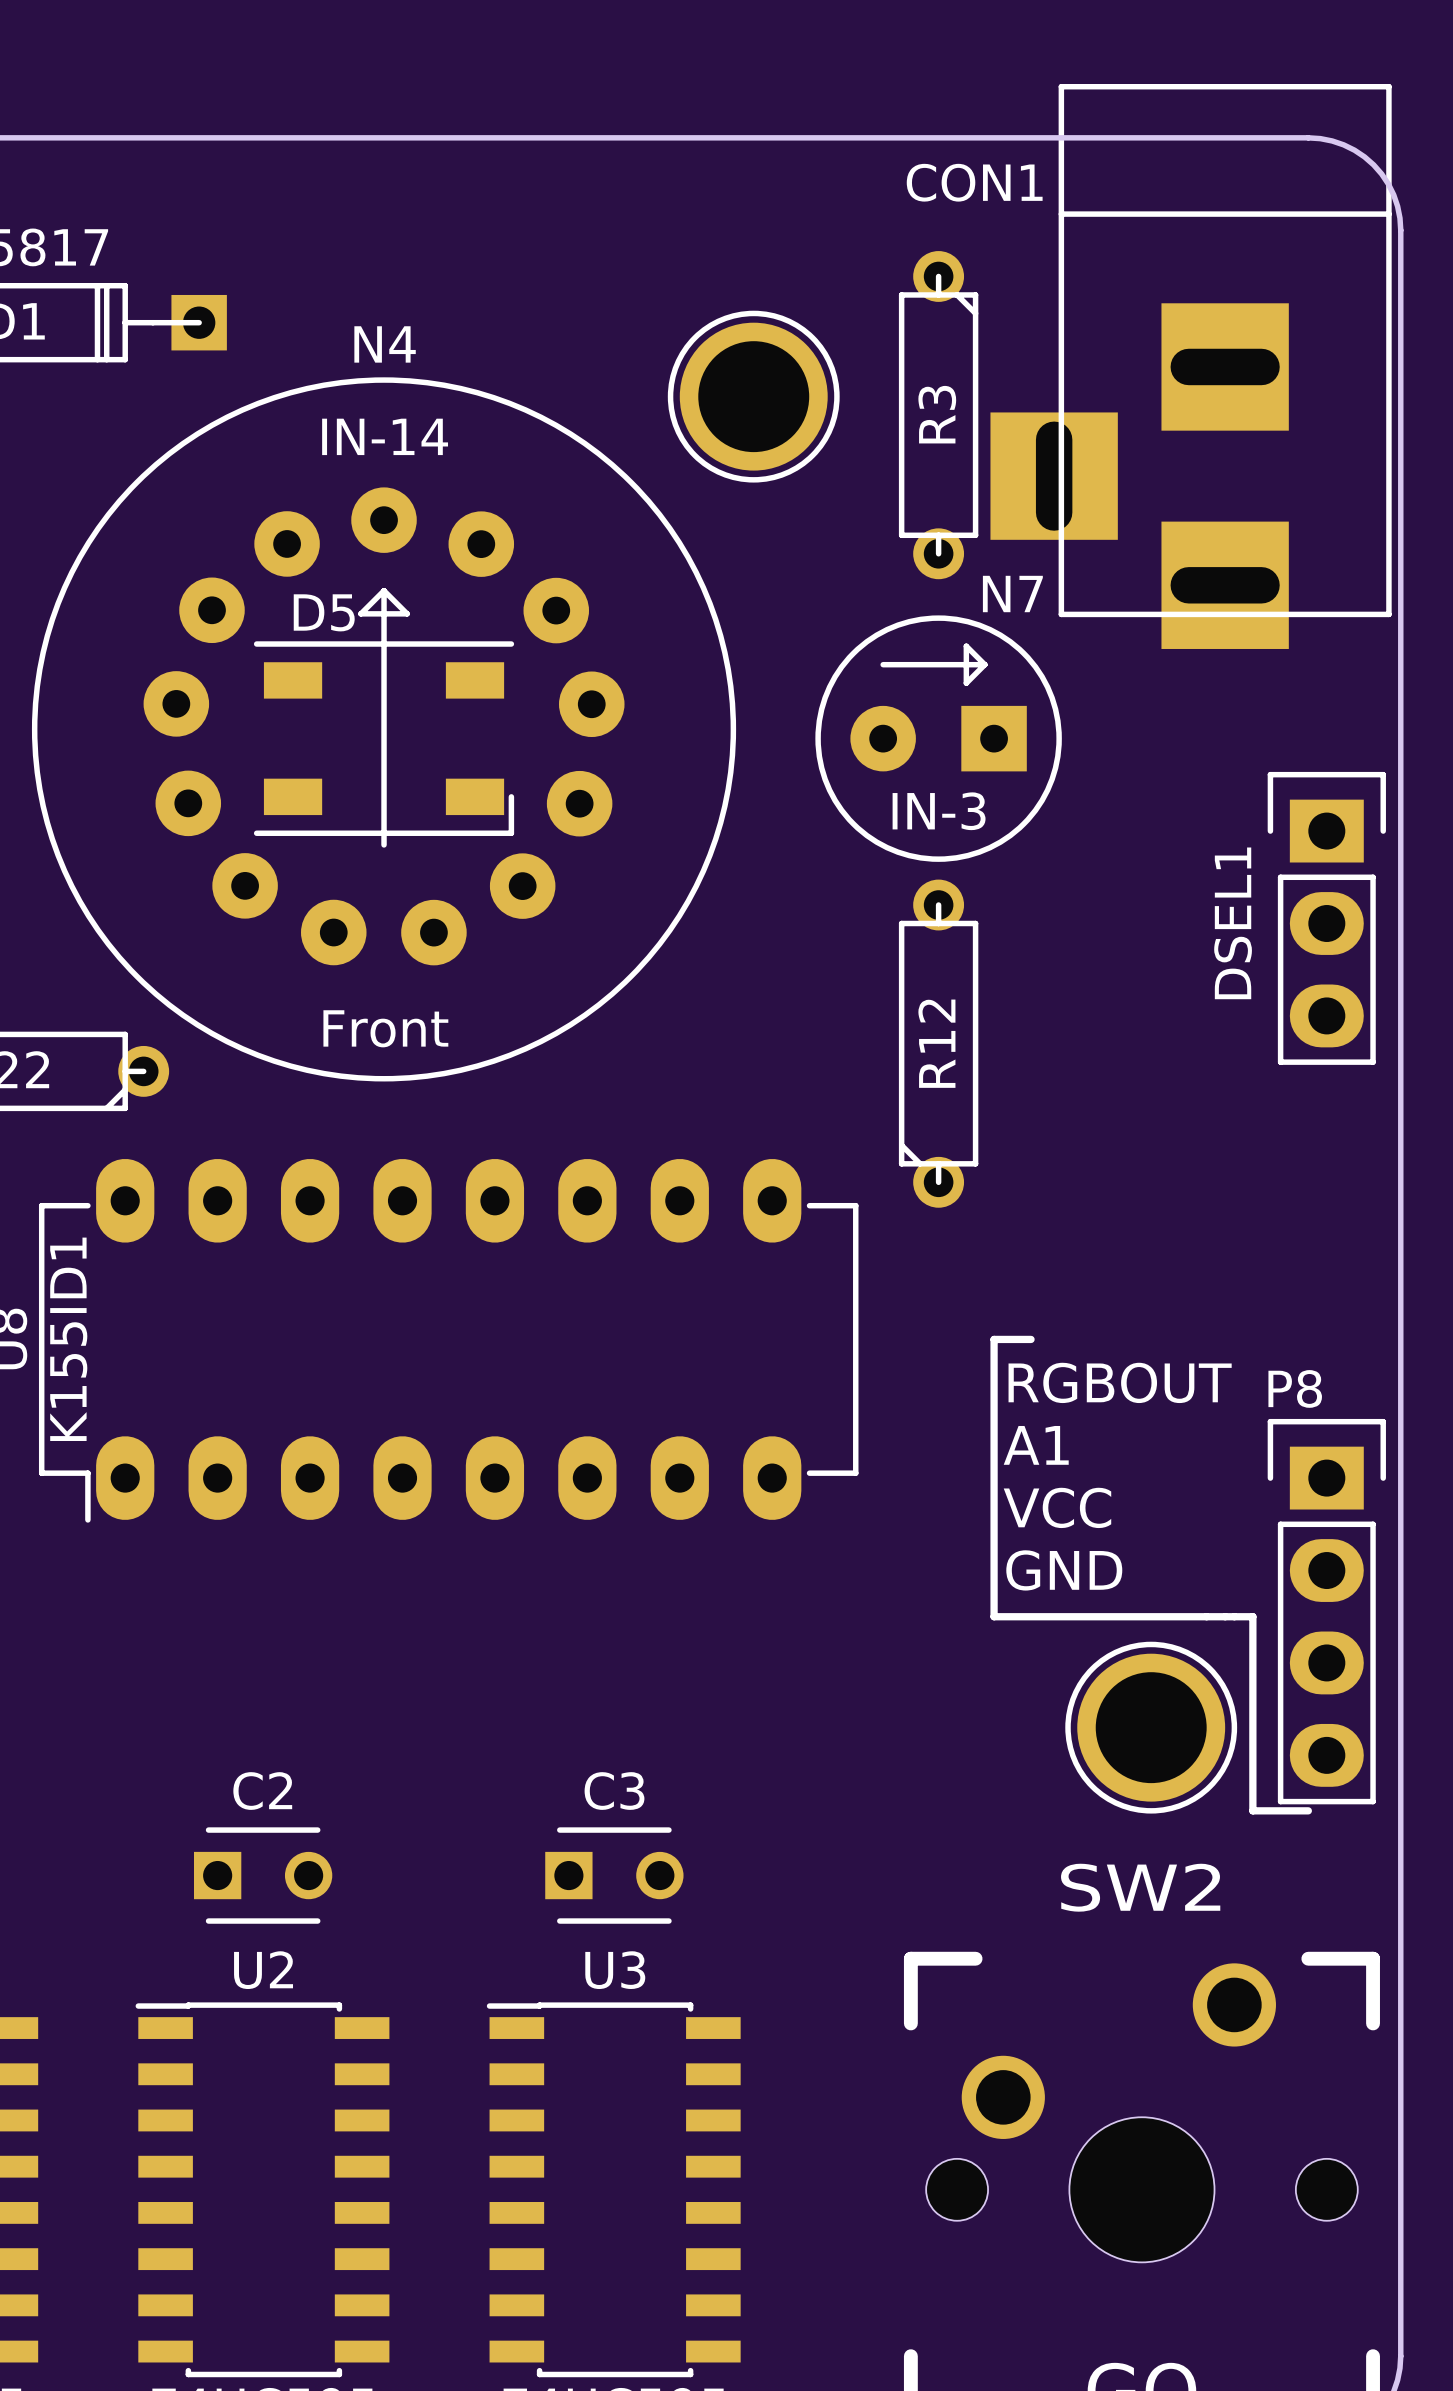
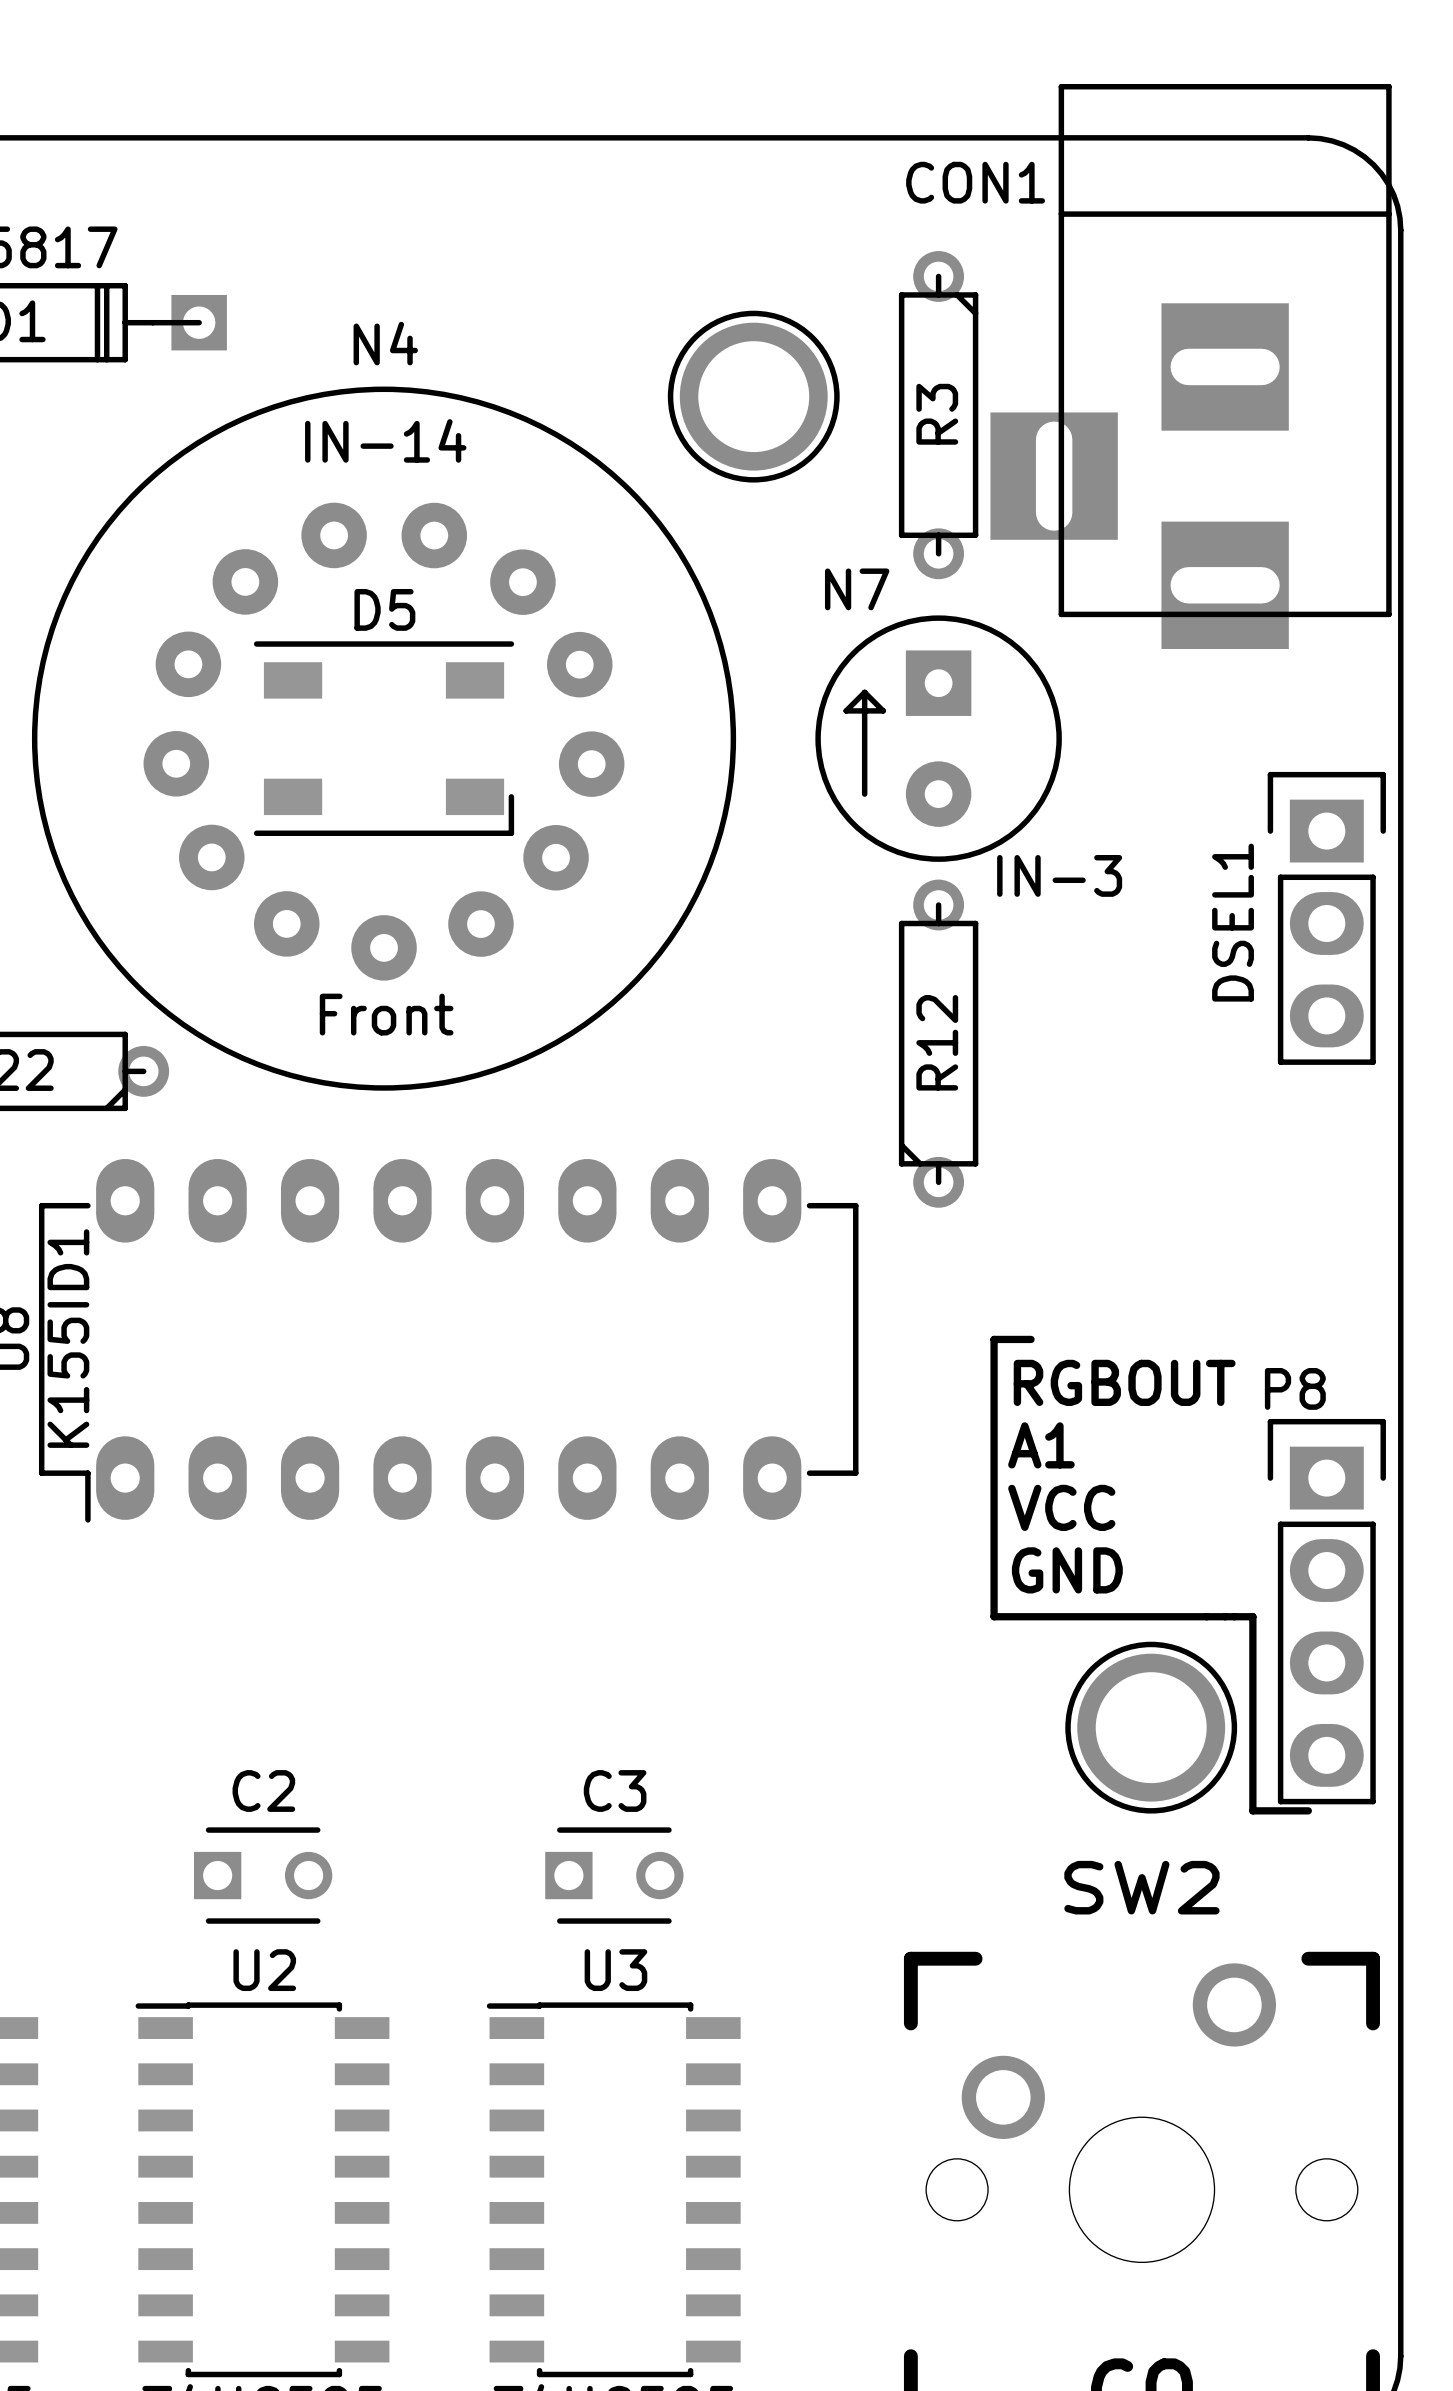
N4 footprint: [31, 377, 737, 1082] -> [31, 386, 737, 1091]
N7 name position: N7 (1012, 594) -> N7 (857, 589)
D5 name position: D5 (324, 612) -> D5 (384, 609)
N7 rotation: 0° (938, 738) -> 90° counterclockwise (938, 738)
N7 value position: IN-3 (939, 811) -> IN-3 (1059, 875)

